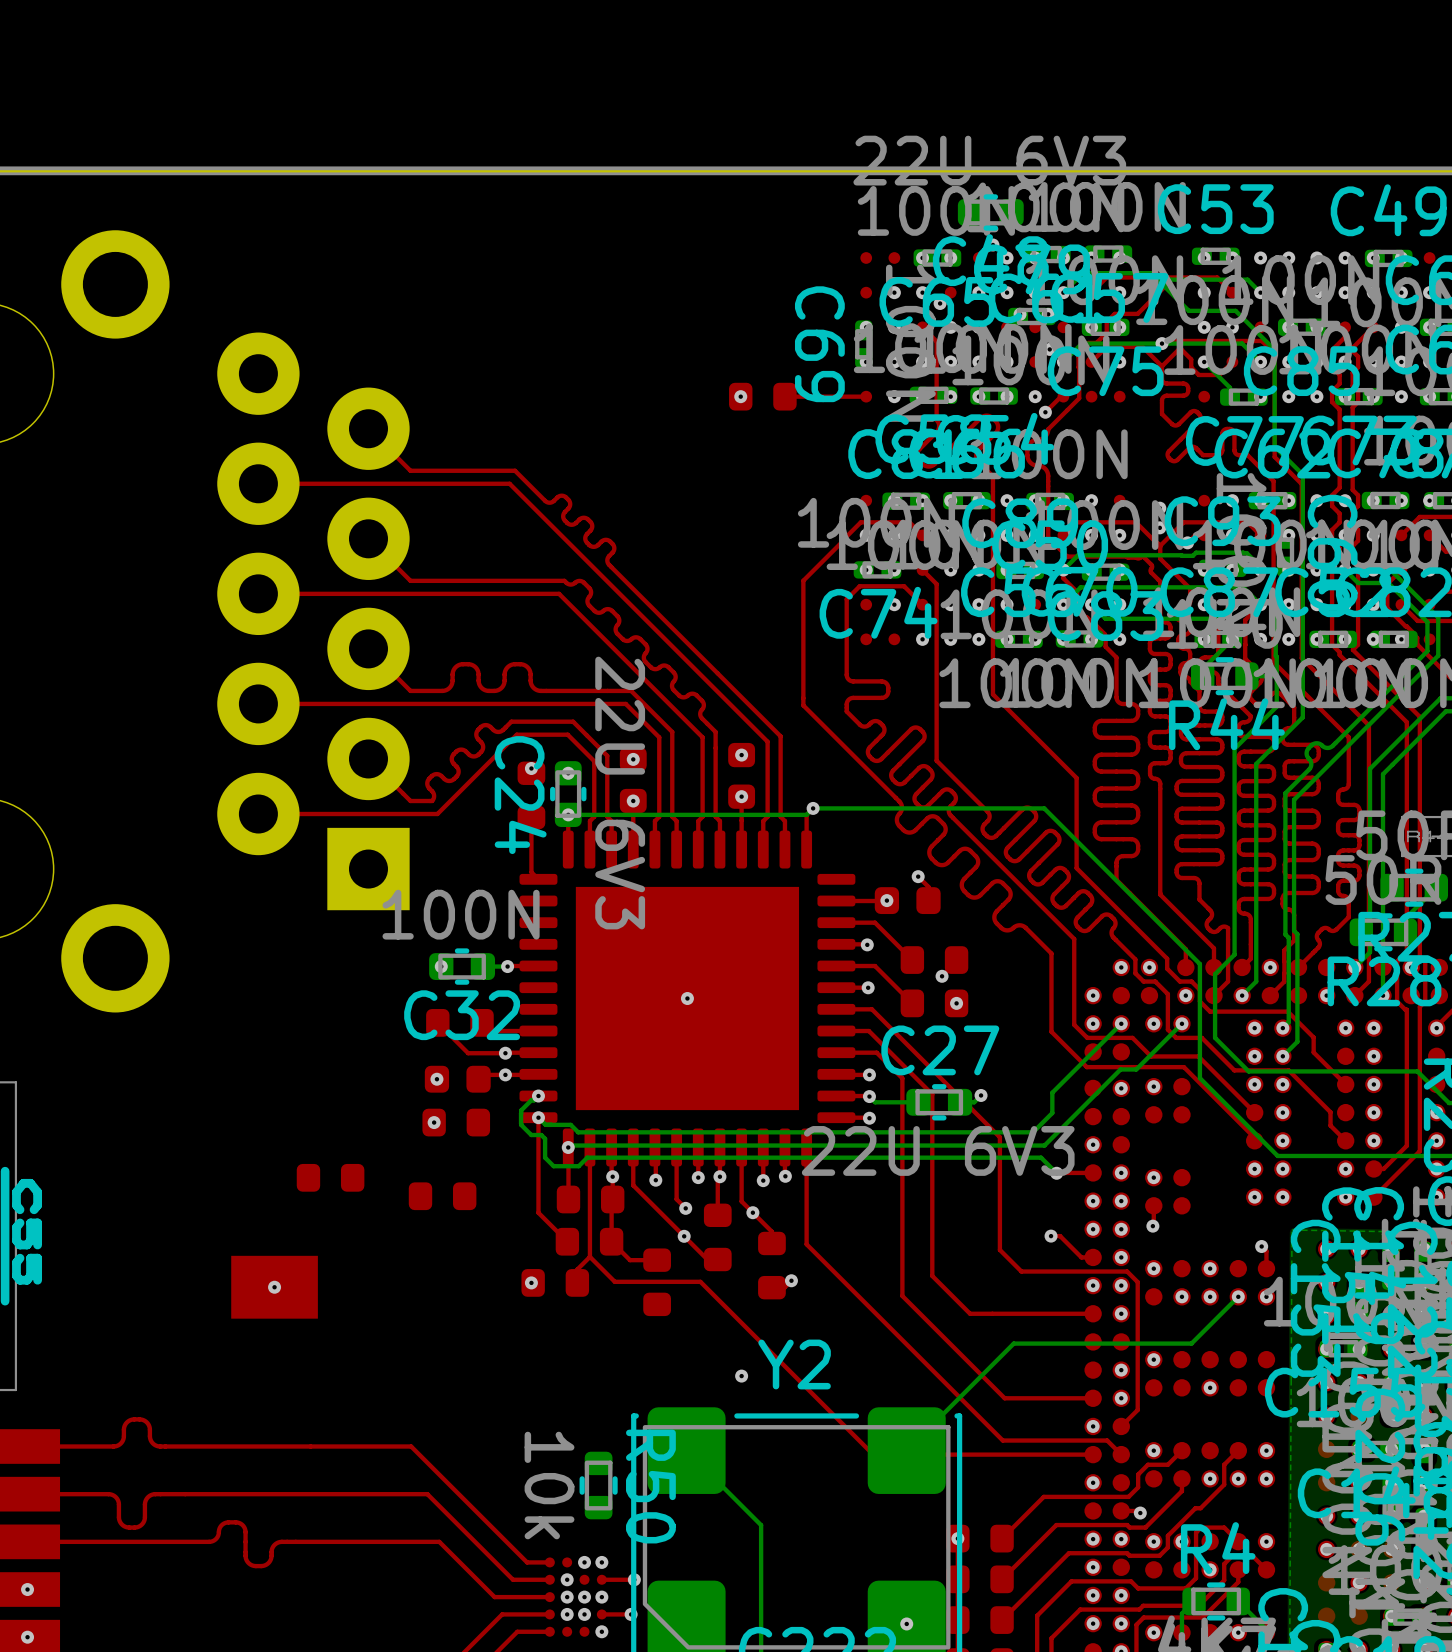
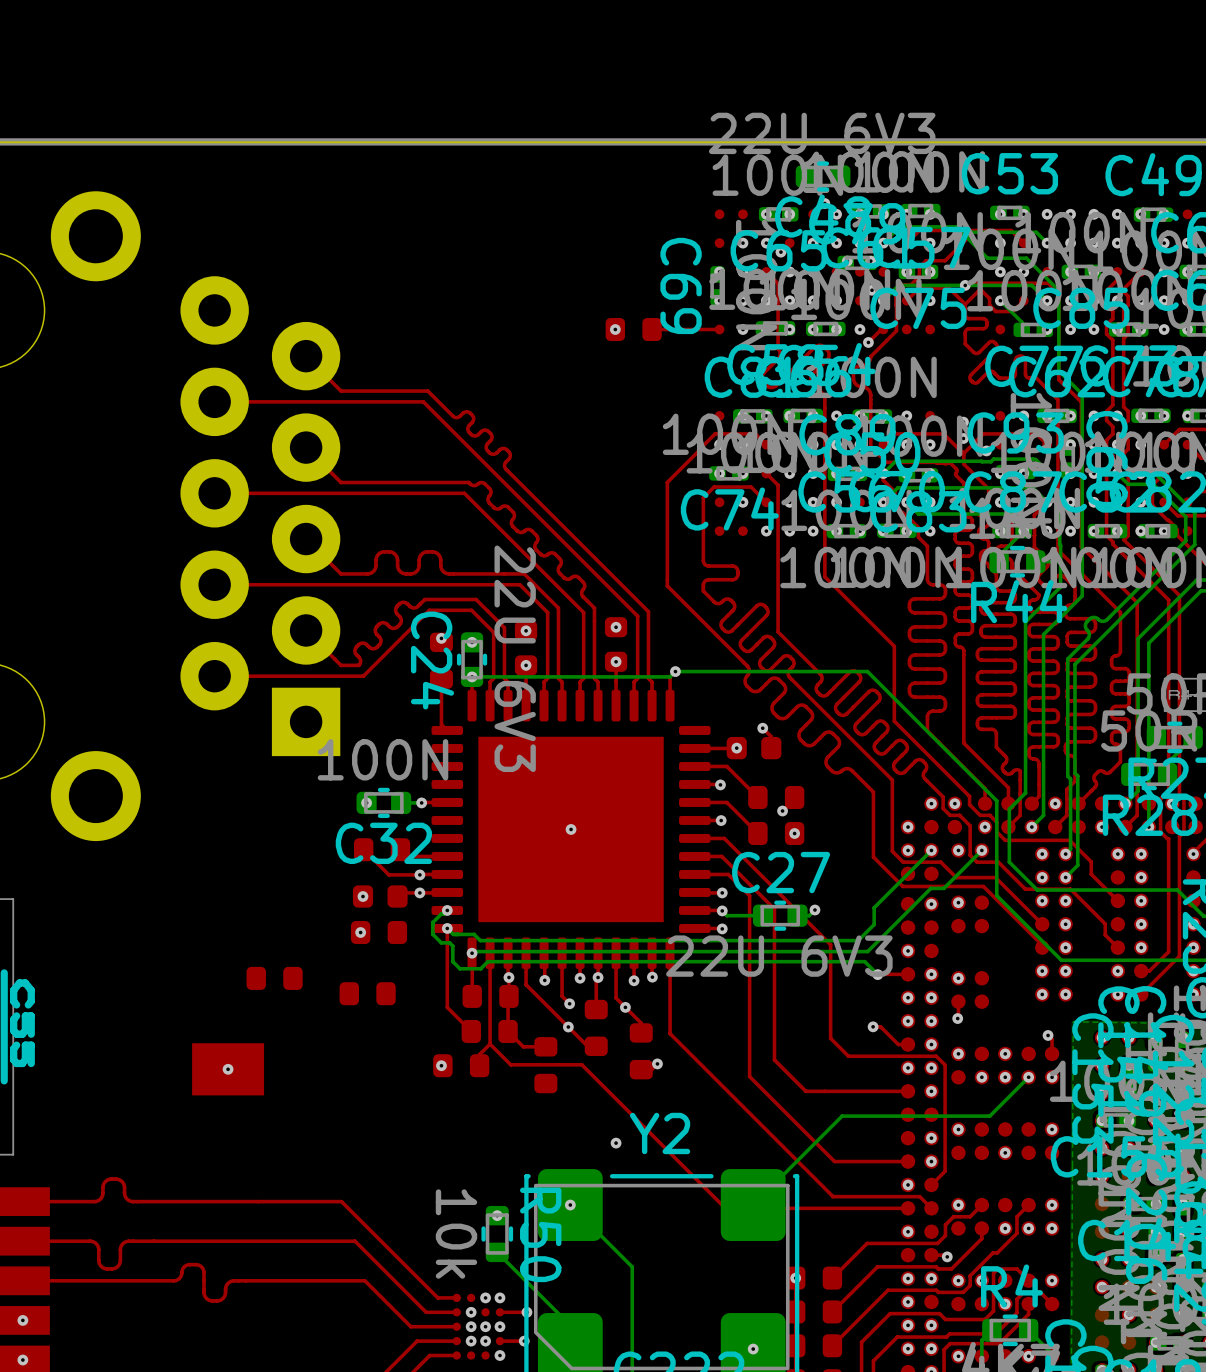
via: none -> (1052, 1129)
via: none -> (570, 1205)
via: none -> (497, 1215)
bottom track: none -> (497, 1252) (570, 1325) (570, 1349)

